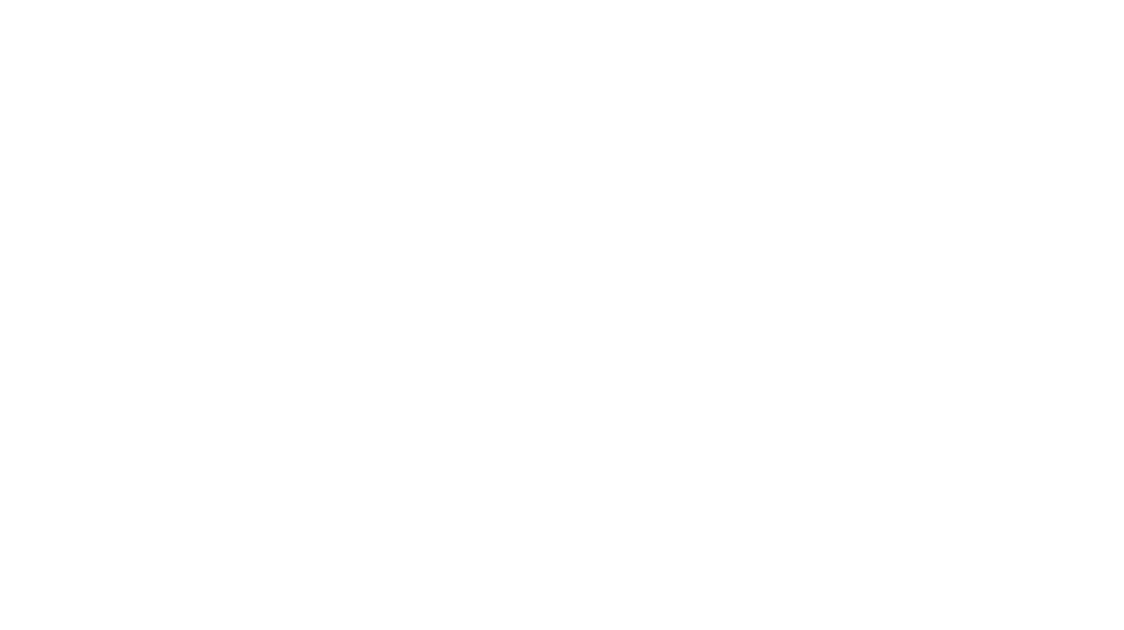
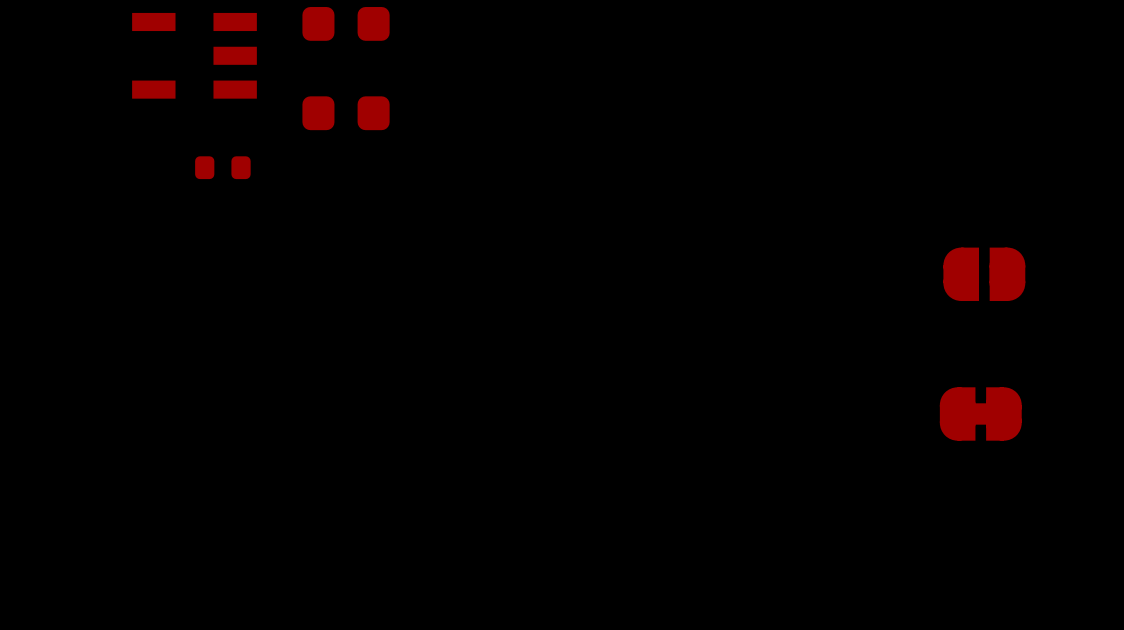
part: none -> (346, 23)
part: none -> (194, 55)
part: none -> (346, 113)
part: none -> (222, 167)
part: none -> (984, 274)
part: none -> (980, 413)

